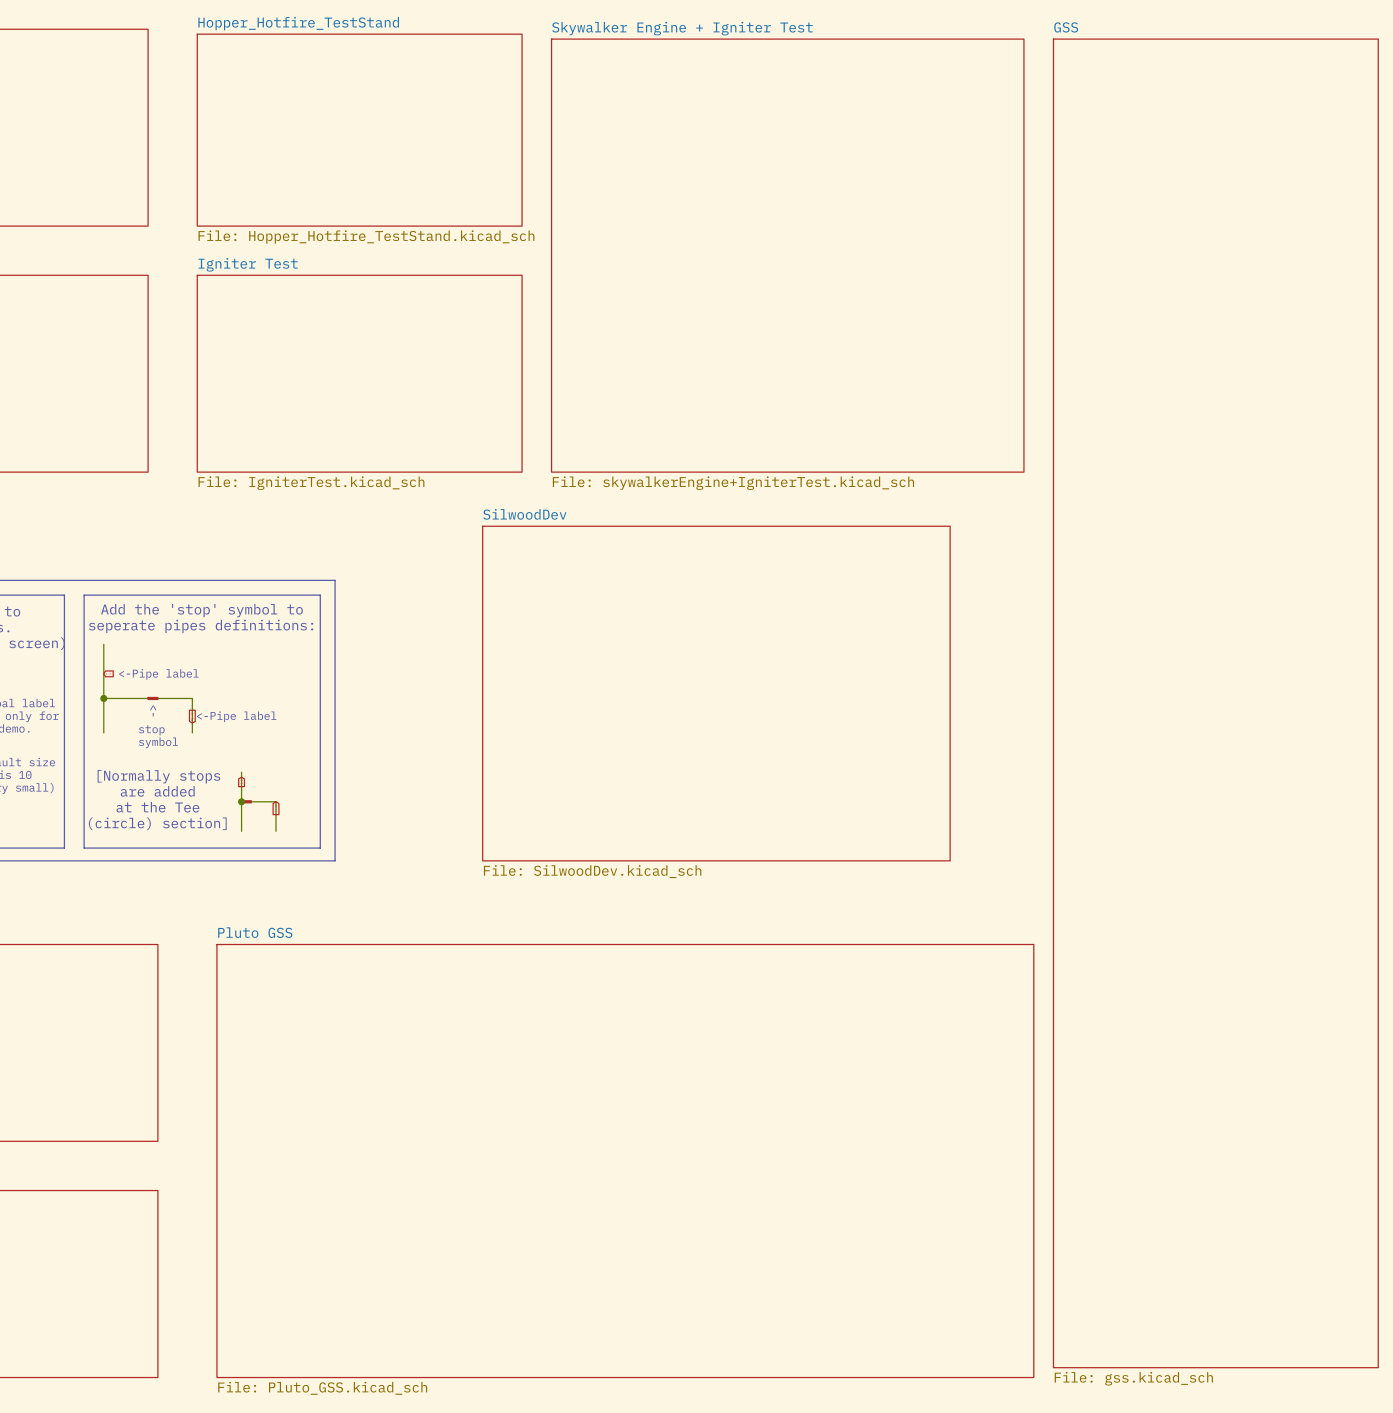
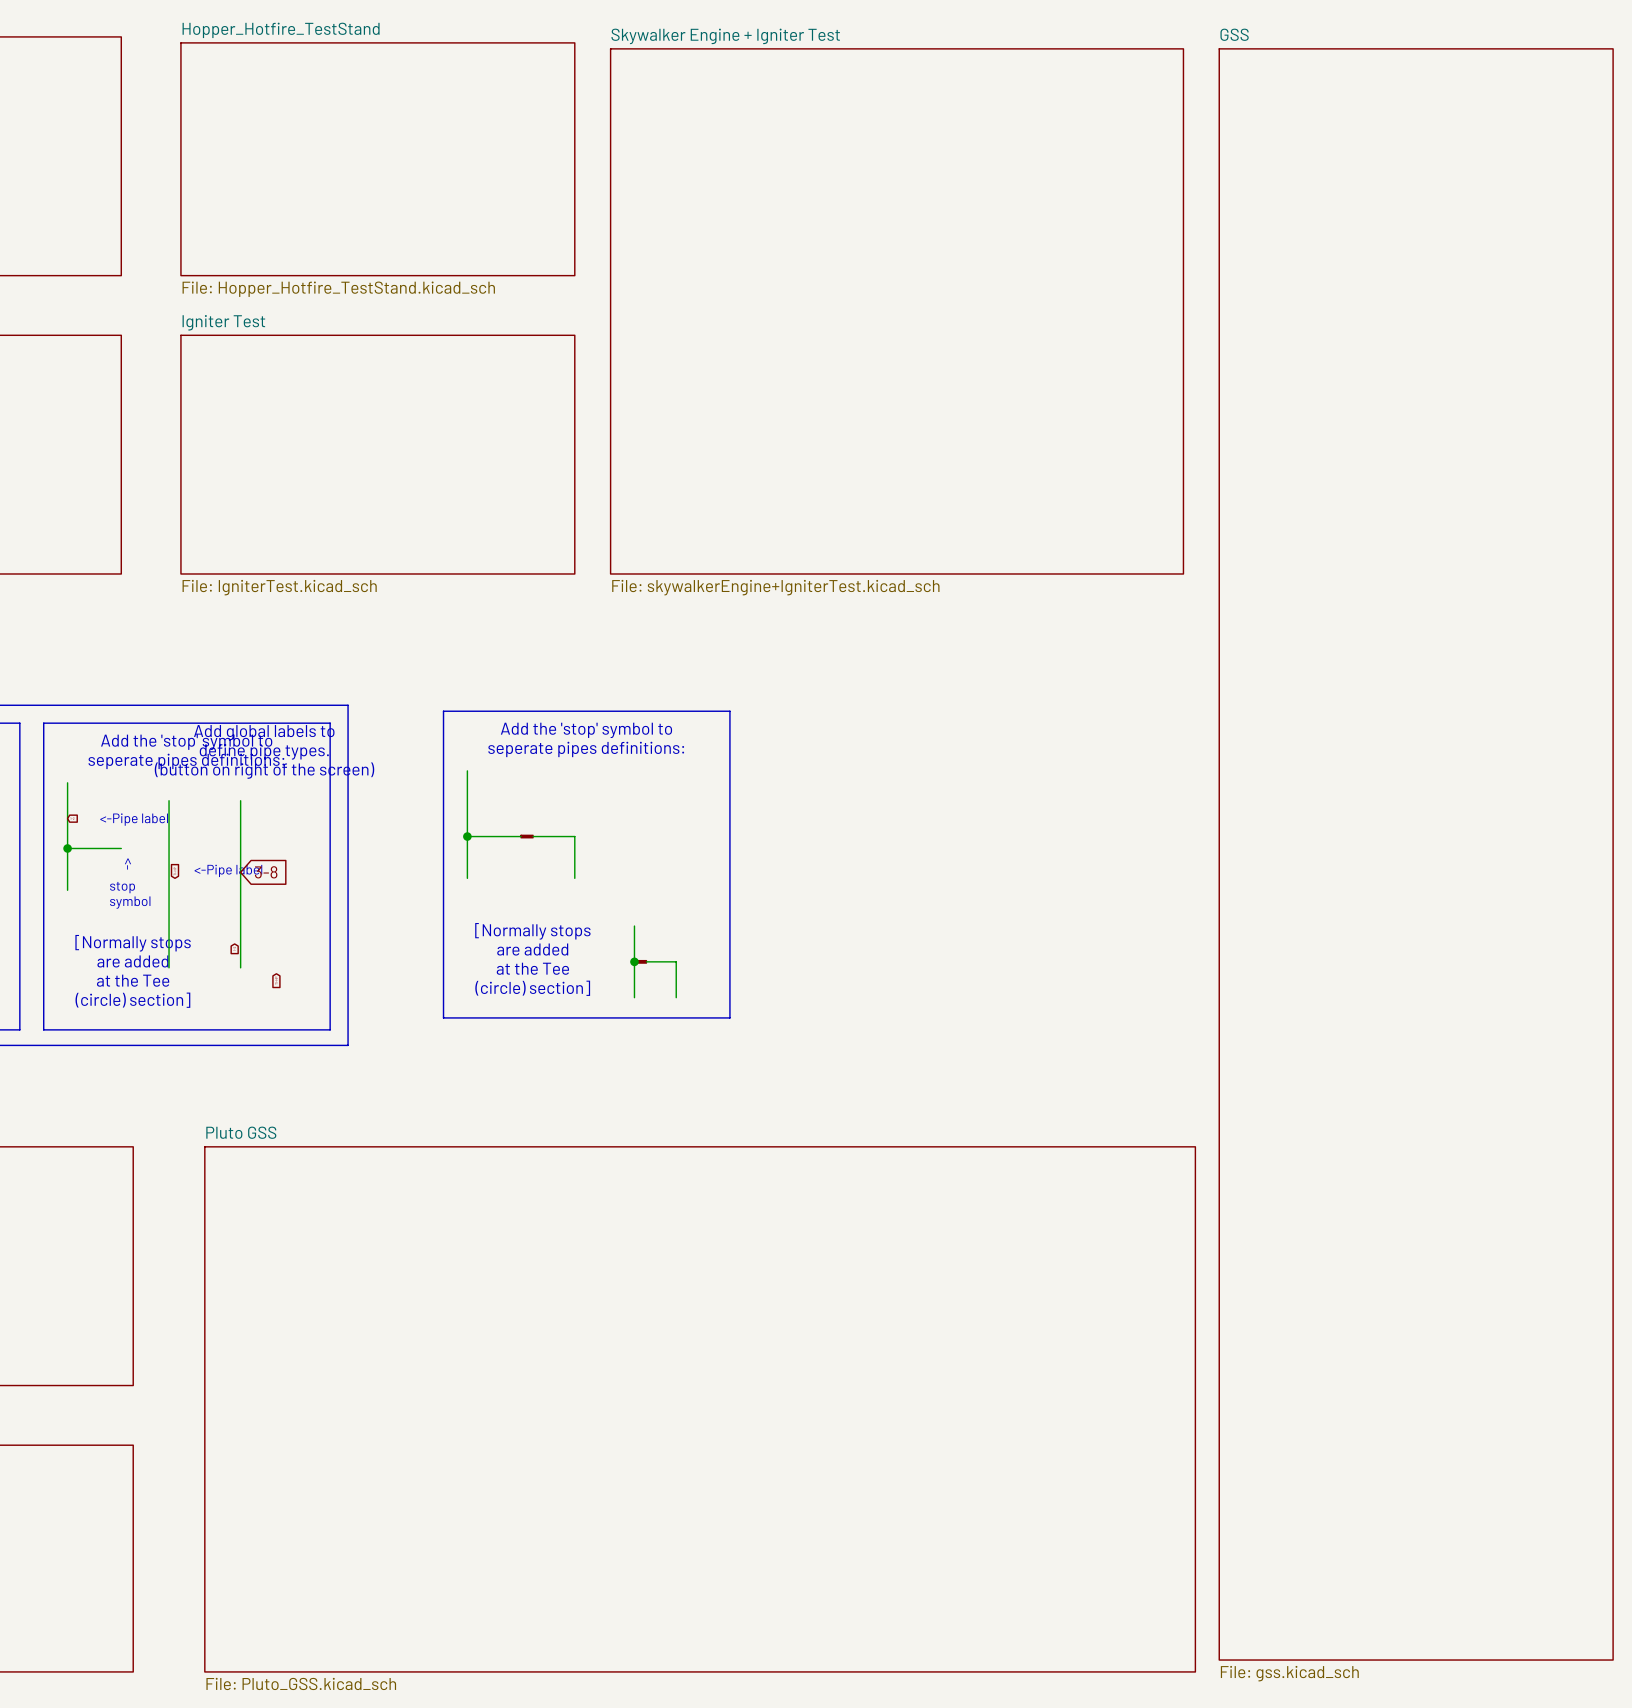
line: none -> (443, 711) (729, 711) (729, 1017) (443, 1017) (443, 711)
text: none -> Add the 'stop' symbol to (586, 730)
text: none -> Add global labels to (264, 732)
text: none -> seperate pipes definitions: (586, 749)
text: none -> define pipe types. (264, 751)
text: none -> (button on right of the screen) (264, 770)
wire: none -> (467, 770) (467, 878)
wire: none -> (169, 800) (169, 967)
wire: none -> (240, 800) (240, 967)
wire: none -> (467, 836) (521, 836)
junction: none -> (467, 836)
part: none -> (527, 836)
wire: none -> (533, 836) (574, 836) (574, 878)
sheet SilwoodDev: File: SilwoodDev.kicad_sch (716, 693) -> none
part: (152, 698) -> none
wire: (157, 698) (192, 698) (192, 732) -> none
global label: none -> 3-8 (266, 872)
wire: none -> (634, 926) (634, 997)
text: none -> [Normally stops (532, 931)
wire: (241, 772) (241, 831) -> none
text: none -> are added (532, 949)
junction: none -> (634, 961)
part: none -> (640, 961)
wire: none -> (646, 961) (676, 961) (676, 997)
text: none -> at the Tee (532, 968)
junction: (241, 801) -> none
part: (246, 801) -> none
wire: (251, 801) (276, 801) (276, 831) -> none
text: none -> (circle) section] (532, 988)

